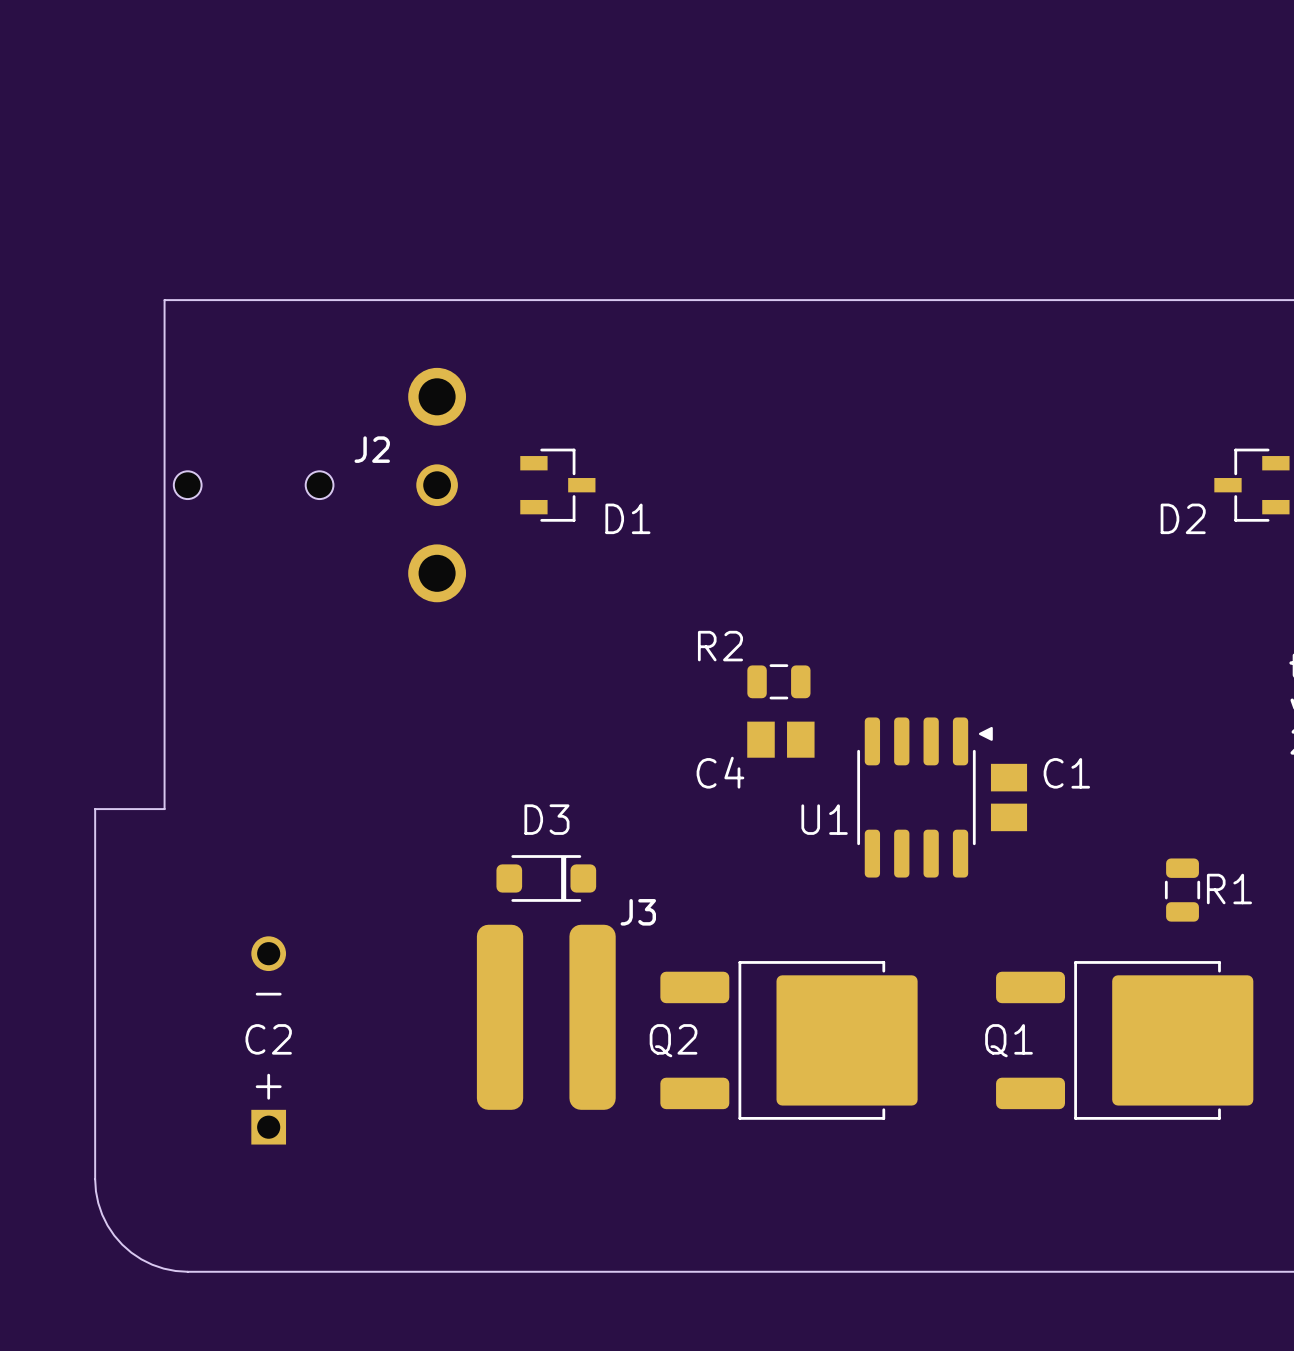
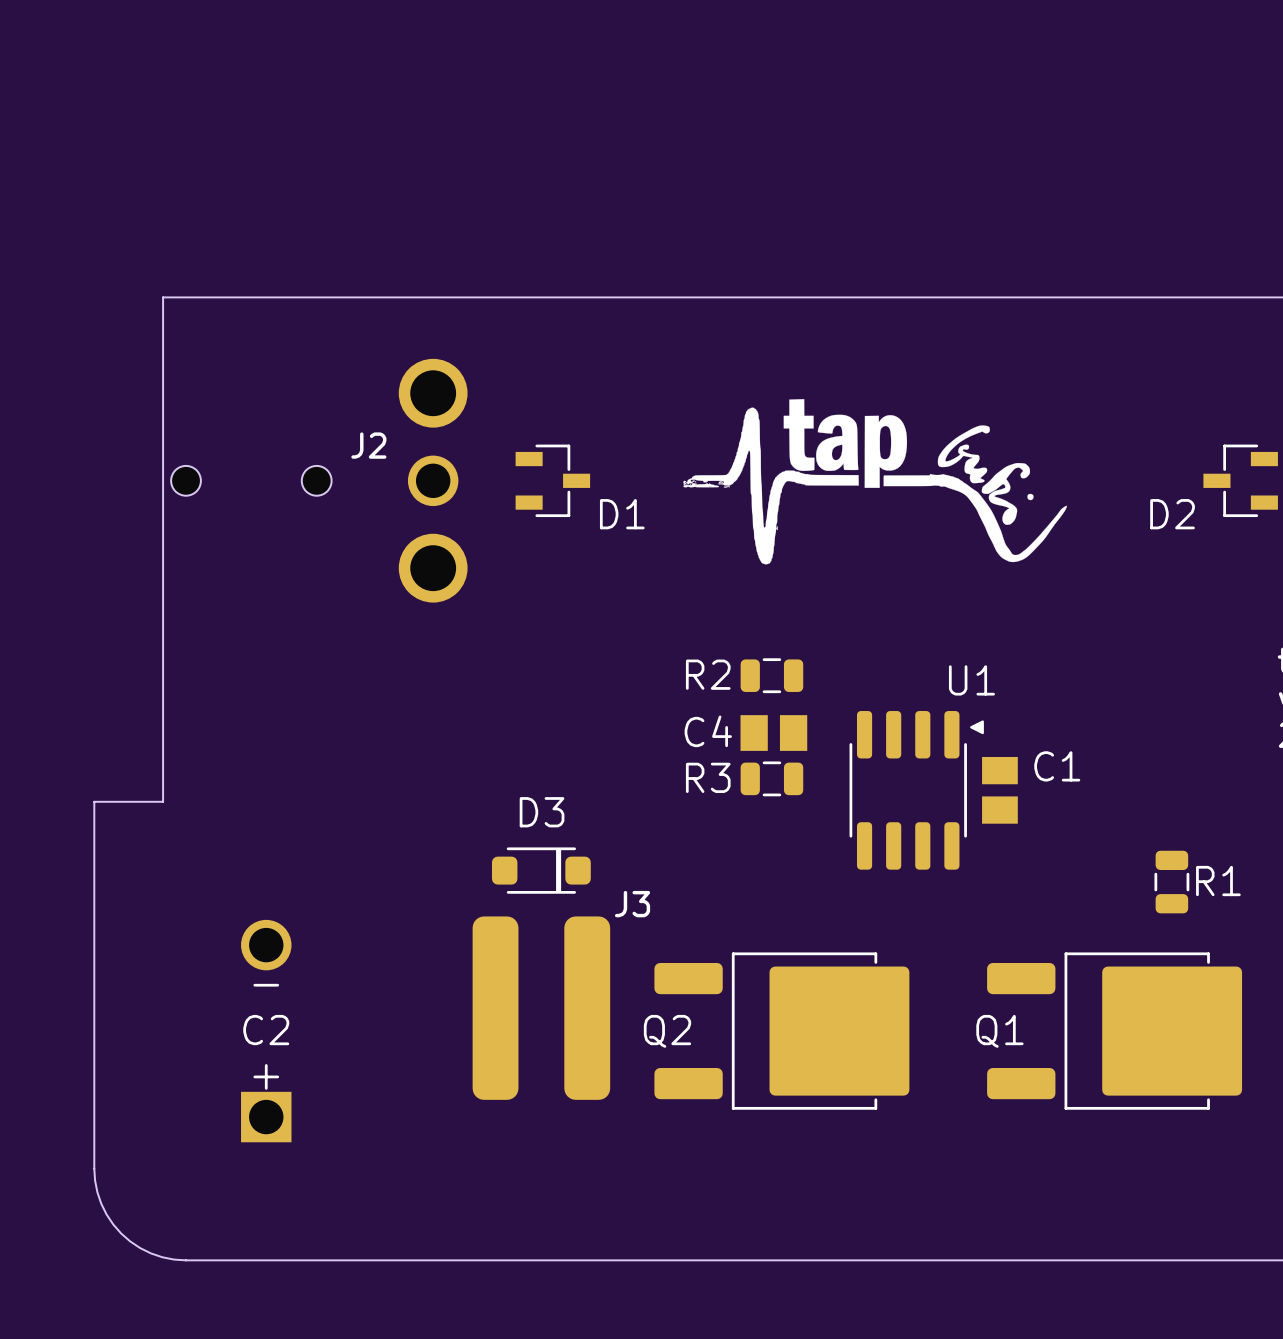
J2 footprint: [173, 367, 467, 603] -> [171, 358, 468, 603]
drawing: none -> [683, 399, 1067, 565]
R2 name position: R2 (720, 646) -> R2 (708, 674)
C4 name position: C4 (720, 772) -> C4 (708, 731)
R3: none -> (771, 778)
U1 name position: U1 (824, 819) -> U1 (971, 680)
C2 footprint: [251, 936, 287, 1145] -> [241, 919, 292, 1143]

